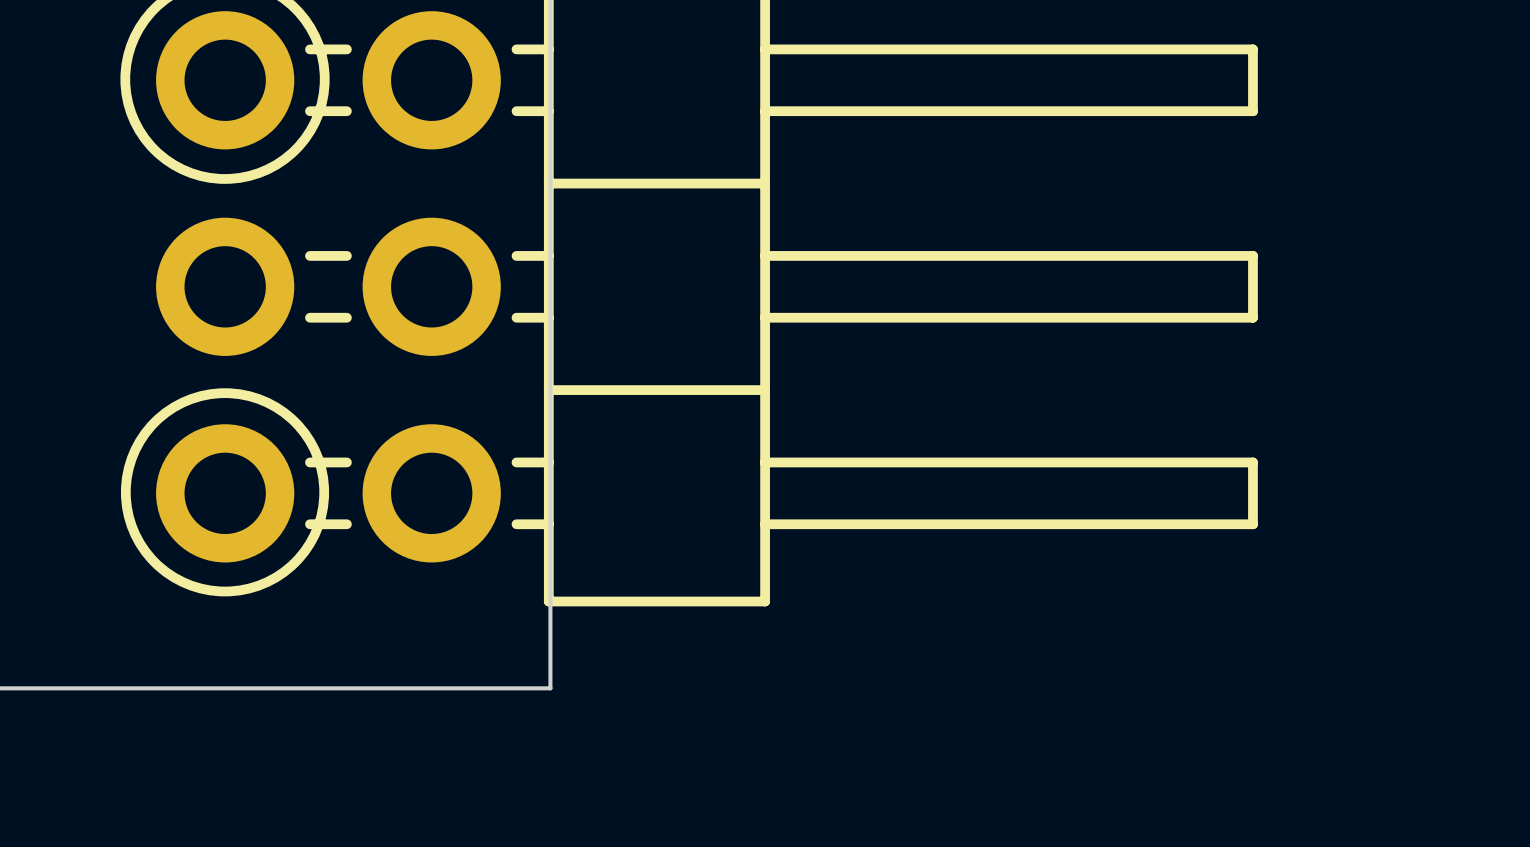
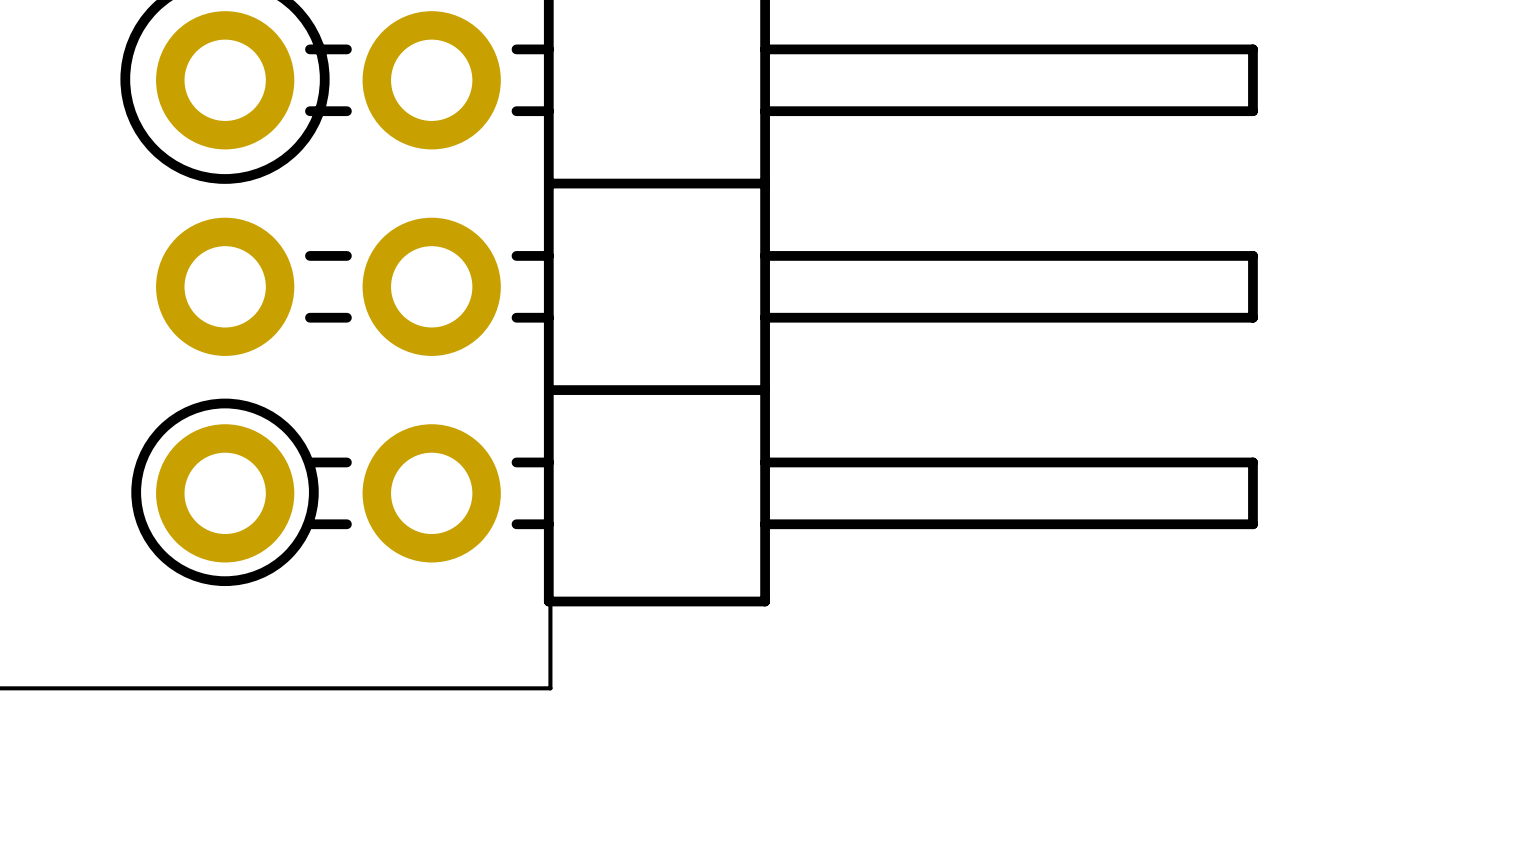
drawing shape: [120, 388, 330, 597] -> [131, 398, 319, 587]

